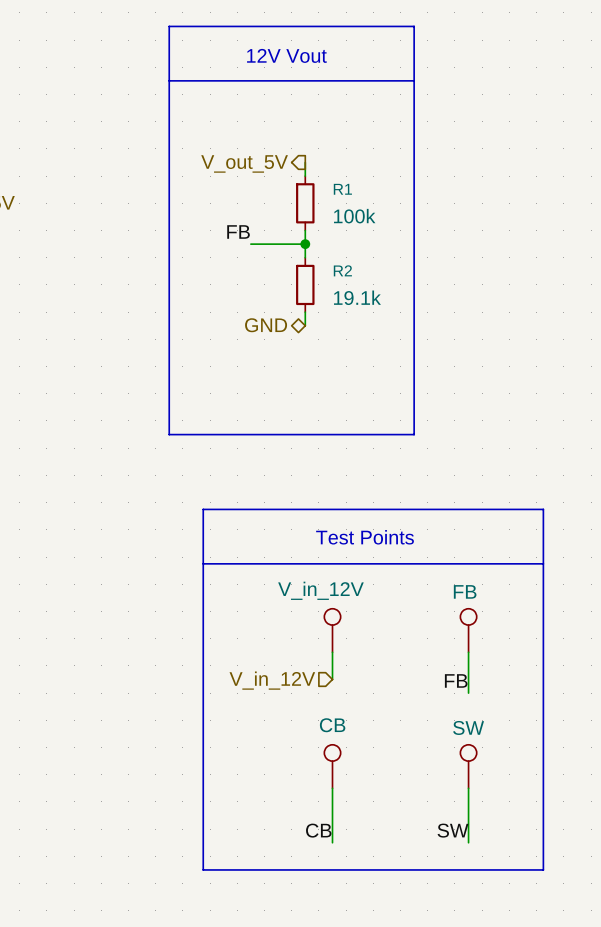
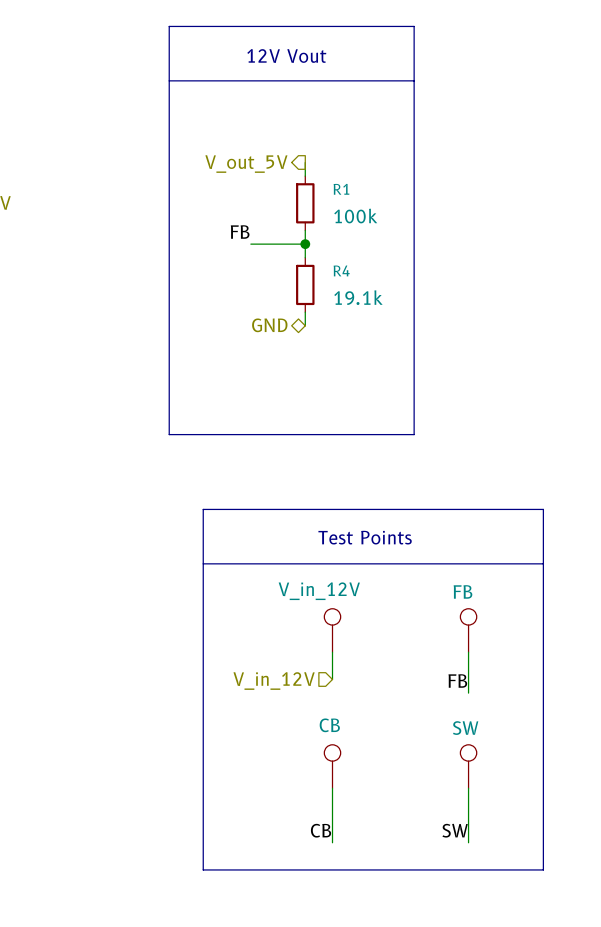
R2 name: R2 (342, 270) -> R4 (341, 270)

